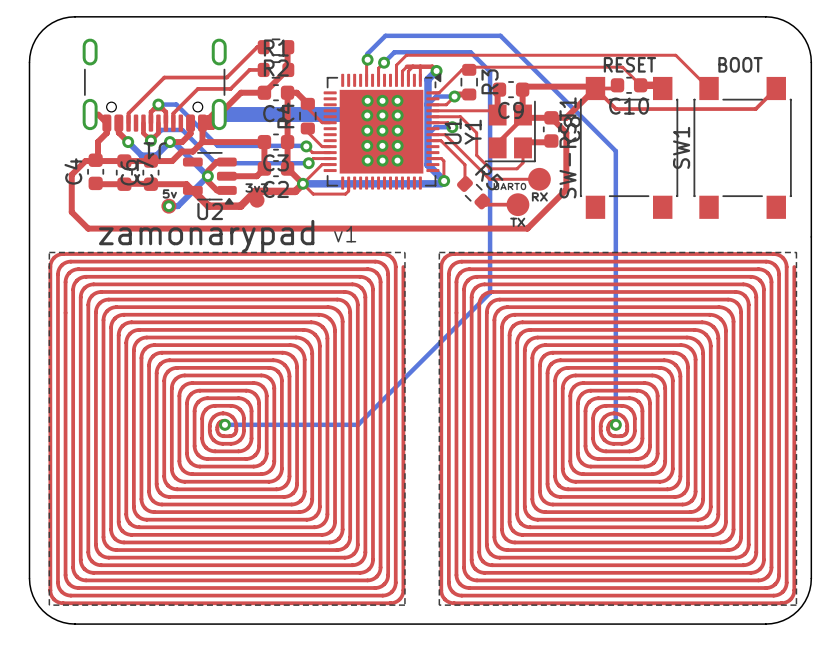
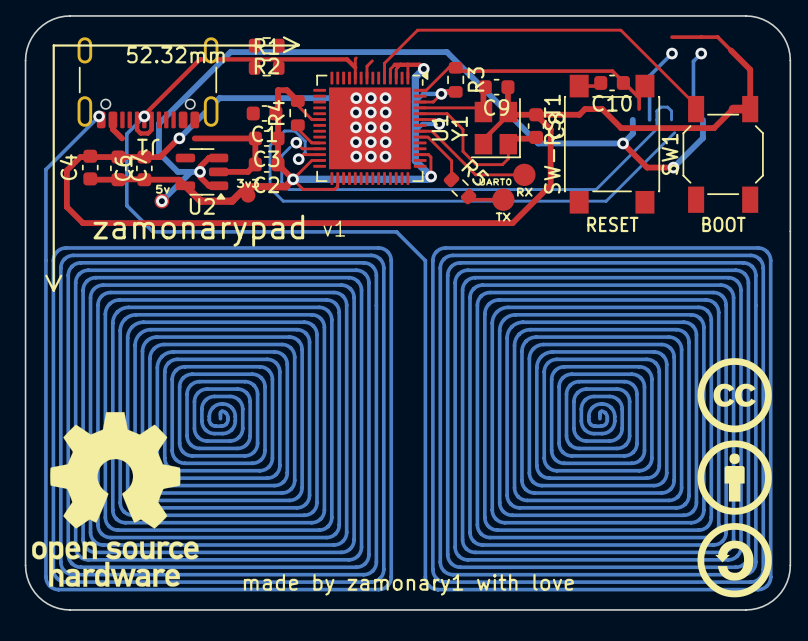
line: none -> (283, 37) (298, 44) (283, 52)
top track: (287, 43) (287, 69) (264, 92) (241, 92) (211, 122) (207, 122) -> none
top track: (263, 47) (257, 47) (226, 77) (164, 77) (128, 113) (128, 123) -> none
line: none -> (298, 45) (53, 45) (53, 290)
top track: (406, 55) (675, 55) (709, 88) -> (394, 53) (417, 30) (620, 30) (696, 105) (696, 109)
bottom track: none -> (672, 53) (649, 75) (649, 119)
via: none -> (672, 53)
bottom track: none -> (701, 53) (693, 61) (693, 119)
via: none -> (701, 53)
text: none -> 52.32mm (175, 54)
bottom track: (367, 59) (367, 53) (385, 35) (500, 35) (615, 151) (615, 424) -> none
via: (367, 59) -> none
bottom track: (383, 62) (394, 52) (470, 52) (490, 71) (490, 292) (358, 424) (224, 424) -> none
via: (384, 62) -> none
text position: RESET (629, 64) -> RESET (612, 224)
text position: BOOT (740, 64) -> BOOT (723, 224)
top track: (264, 69) (249, 69) (230, 88) (197, 88) (173, 113) (173, 123) -> none
top track: (469, 69) (471, 67) (622, 67) (640, 85) (659, 85) (662, 88) -> (456, 68) (458, 71) (612, 71) (639, 97) (639, 109)
SW1 footprint: [693, 76, 792, 219] -> [682, 95, 764, 213]
top track: (525, 86) (593, 86) (595, 88) -> none
top track: (595, 88) (566, 117) -> (672, 37) (717, 37) (750, 69) (750, 109) (733, 109) (714, 128) (621, 128) (602, 109) (585, 109) (579, 114) (550, 114)
top track: (595, 88) (616, 109) (755, 109) (776, 88) -> none
C1 position: (275, 92) -> (264, 113)
bottom track: none -> (356, 98) (219, 98) (179, 138)
bottom track: (158, 104) (176, 104) (217, 145) (306, 146) -> none
via: (158, 104) -> none
top track: (90, 114) (98, 114) (106, 123) (106, 133) (98, 141) (98, 161) -> none
bottom track: (219, 114) (366, 114) -> none
top track: (150, 118) (150, 112) (153, 109) (162, 109) (165, 112) (165, 123) -> (144, 114) (199, 59) (347, 59) (355, 67)
bottom track: none -> (99, 116) (45, 169) (45, 576) (47, 583) (52, 587) (58, 589) (378, 589) (387, 585) (391, 576)
via: none -> (99, 116)
bottom track: none -> (144, 116) (126, 133) (126, 205) (153, 231) (396, 231) (425, 260) (425, 576) (430, 586) (438, 589) (758, 589) (767, 585) (770, 576)
via: none -> (144, 116)
top track: (190, 123) (190, 133) (182, 142) (169, 142) -> none
top track: (202, 123) (202, 142) (192, 151) (181, 151) (172, 161) (166, 161) -> (179, 138) (160, 157)
bottom track: none -> (632, 119) (632, 133) (623, 143) (538, 143) (446, 52) (230, 52) (158, 123) (158, 152) (177, 171) (200, 171)
bottom track: none -> (671, 119) (671, 111) (667, 107) (660, 107) (656, 111) (656, 128) (596, 189) (288, 189) (281, 182) (281, 155) (290, 147)
bottom track: none -> (702, 119) (702, 138) (673, 167)
bottom track: (150, 140) (161, 129) (182, 129) (215, 163) (308, 163) -> (674, 132) (606, 201) (283, 201) (270, 188) (270, 145) (284, 131) (294, 131) (305, 141) (305, 152) (298, 159)
via: (150, 140) -> none
via: none -> (179, 138)
bottom track: (128, 142) (141, 155) (156, 155) (169, 142) (173, 142) (207, 176) (177, 206) (168, 206) -> (191, 171) (161, 201)
via: (128, 142) -> none
via: (169, 142) -> none
top track: none -> (623, 143) (647, 167) (673, 167)
via: none -> (623, 143)
via: none -> (673, 167)
line: (49, 252) (404, 252) (404, 605) (49, 605) (49, 252) -> none
line: (439, 252) (796, 252) (796, 605) (439, 605) (439, 252) -> none
top track: (403, 266) (403, 590) (399, 599) (390, 603) (63, 603) (54, 599) (50, 590) -> none
top track: (794, 267) (794, 590) (790, 599) (781, 603) (454, 603) (445, 599) (441, 590) -> none
line: none -> (46, 275) (53, 290) (61, 275)
drawing: none -> [697, 358, 772, 598]
drawing: none -> [32, 412, 199, 587]
via: (224, 424) -> none
via: (615, 424) -> none
top track: (224, 428) (224, 421) (220, 421) (217, 427) (219, 434) (230, 436) (235, 433) (236, 423) (232, 417) (223, 413) (213, 417) (210, 423) (209, 430) (214, 441) (221, 443) (232, 443) (240, 439) (243, 432) (243, 418) (240, 409) (230, 405) (212, 406) (205, 409) (202, 417) (202, 438) (207, 448) (213, 451) (238, 451) (248, 446) (251, 439) (251, 411) (247, 402) (238, 398) (206, 398) (198, 402) (194, 411) (194, 447) (198, 455) (205, 458) (246, 458) (256, 454) (259, 447) (259, 403) (255, 394) (246, 390) (198, 390) (190, 394) (187, 403) (187, 453) (190, 462) (199, 466) (253, 466) (262, 462) (266, 453) (266, 394) (262, 386) (253, 383) (191, 383) (183, 386) (179, 396) (179, 461) (183, 470) (192, 474) (261, 474) (270, 470) (274, 461) (274, 388) (270, 379) (261, 375) (184, 375) (175, 379) (171, 388) (171, 468) (175, 477) (184, 481) (268, 481) (278, 477) (281, 468) (281, 380) (278, 371) (268, 367) (177, 367) (168, 371) (164, 380) (164, 476) (168, 485) (177, 489) (276, 489) (285, 485) (289, 476) (289, 376) (284, 365) (273, 360) (169, 360) (160, 364) (156, 373) (156, 483) (160, 493) (169, 496) (284, 496) (293, 493) (297, 483) (297, 367) (292, 356) (282, 352) (162, 352) (152, 356) (149, 365) (149, 491) (152, 500) (162, 504) (291, 504) (300, 500) (304, 491) (304, 359) (300, 349) (290, 345) (154, 345) (145, 348) (141, 358) (141, 499) (145, 508) (154, 512) (299, 512) (308, 508) (312, 499) (312, 353) (307, 342) (296, 337) (146, 337) (137, 341) (133, 350) (133, 506) (137, 515) (146, 519) (306, 519) (316, 515) (319, 506) (319, 346) (315, 334) (303, 329) (139, 329) (130, 333) (126, 342) (126, 514) (130, 523) (139, 527) (314, 527) (323, 523) (327, 514) (327, 338) (322, 327) (311, 322) (131, 322) (122, 326) (118, 335) (118, 521) (122, 531) (131, 534) (322, 534) (331, 531) (335, 521) (335, 330) (330, 319) (318, 314) (124, 314) (114, 318) (111, 327) (111, 529) (114, 538) (124, 542) (329, 542) (338, 538) (342, 529) (342, 321) (338, 311) (328, 307) (116, 307) (107, 310) (103, 320) (103, 537) (107, 546) (116, 550) (337, 550) (346, 546) (350, 537) (350, 312) (346, 303) (337, 299) (108, 299) (99, 303) (95, 312) (95, 544) (99, 553) (108, 557) (344, 557) (353, 553) (357, 544) (357, 304) (353, 295) (344, 291) (101, 291) (92, 295) (88, 304) (88, 552) (92, 561) (101, 565) (352, 565) (361, 561) (365, 552) (365, 297) (361, 288) (352, 284) (93, 284) (84, 288) (80, 297) (80, 559) (84, 569) (93, 572) (360, 572) (369, 569) (372, 559) (372, 289) (369, 280) (360, 276) (86, 276) (76, 280) (73, 289) (73, 567) (76, 576) (86, 580) (367, 580) (376, 576) (380, 567) (380, 282) (376, 272) (367, 269) (78, 269) (69, 272) (65, 282) (65, 575) (69, 584) (78, 588) (375, 588) (384, 584) (388, 575) (388, 274) (384, 265) (375, 261) (70, 261) (61, 265) (57, 274) (57, 582) (61, 591) (70, 595) (382, 595) (391, 591) (395, 582) (395, 266) (391, 257) (382, 254) (63, 254) (54, 257) (50, 266) (50, 590) -> none
bottom track: none -> (220, 418) (220, 412) (224, 412) (227, 417) (225, 424) (214, 426) (210, 423) (209, 414) (213, 407) (221, 403) (231, 407) (234, 413) (235, 420) (230, 430) (224, 433) (212, 433) (204, 428) (201, 422) (201, 409) (205, 400) (214, 396) (232, 396) (239, 400) (242, 407) (242, 428) (237, 438) (231, 440) (207, 441) (197, 436) (194, 429) (194, 401) (198, 392) (207, 389) (238, 389) (246, 392) (250, 401) (250, 437) (246, 444) (239, 448) (199, 448) (189, 443) (187, 437) (187, 394) (190, 385) (199, 381) (246, 381) (253, 385) (257, 394) (257, 443) (253, 452) (244, 455) (192, 455) (183, 452) (179, 443) (179, 385) (183, 377) (192, 374) (253, 374) (261, 377) (265, 386) (265, 450) (261, 459) (252, 463) (184, 463) (175, 459) (172, 450) (172, 379) (175, 370) (184, 366) (259, 366) (268, 370) (272, 379) (272, 458) (268, 467) (259, 470) (177, 470) (168, 467) (164, 458) (164, 372) (168, 363) (177, 359) (267, 359) (276, 363) (279, 372) (279, 465) (276, 474) (267, 478) (170, 478) (161, 474) (157, 465) (157, 367) (161, 356) (173, 351) (274, 351) (283, 355) (287, 364) (287, 472) (283, 481) (274, 485) (162, 485) (153, 481) (149, 472) (149, 358) (154, 348) (164, 344) (282, 344) (290, 348) (294, 357) (294, 480) (290, 489) (282, 493) (155, 493) (146, 489) (142, 480) (142, 351) (146, 341) (156, 337) (289, 337) (298, 340) (302, 349) (302, 487) (298, 496) (289, 500) (147, 500) (138, 496) (135, 487) (135, 345) (139, 334) (150, 329) (296, 329) (305, 333) (309, 342) (309, 495) (305, 504) (296, 507) (140, 507) (131, 504) (127, 495) (127, 338) (132, 326) (143, 322) (304, 322) (313, 325) (316, 334) (316, 502) (313, 511) (304, 515) (132, 515) (123, 511) (120, 502) (120, 330) (124, 319) (136, 314) (311, 314) (320, 318) (324, 327) (324, 510) (320, 518) (311, 522) (125, 522) (116, 518) (112, 510) (112, 323) (117, 312) (128, 307) (319, 307) (328, 311) (331, 320) (331, 517) (328, 526) (319, 530) (118, 530) (109, 526) (105, 517) (105, 314) (109, 304) (119, 299) (326, 299) (335, 303) (339, 312) (339, 524) (335, 533) (326, 537) (110, 537) (101, 533) (97, 524) (97, 305) (101, 296) (110, 292) (334, 292) (342, 296) (346, 305) (346, 532) (342, 541) (334, 544) (103, 544) (94, 541) (90, 532) (90, 297) (94, 288) (103, 285) (341, 285) (350, 288) (354, 297) (354, 539) (350, 548) (341, 552) (95, 552) (86, 548) (83, 539) (83, 290) (86, 281) (95, 277) (348, 277) (357, 281) (361, 290) (361, 547) (357, 556) (348, 559) (88, 559) (79, 556) (75, 547) (75, 282) (79, 273) (88, 270) (356, 270) (365, 273) (368, 282) (368, 554) (365, 563) (356, 567) (80, 567) (71, 563) (68, 554) (68, 275) (71, 266) (80, 262) (363, 262) (372, 266) (376, 275) (376, 562) (372, 570) (363, 574) (73, 574) (64, 570) (60, 562) (60, 268) (64, 259) (73, 255) (371, 255) (380, 259) (383, 268) (383, 569) (380, 578) (371, 582) (66, 582) (57, 578) (53, 569) (53, 260) (57, 251) (66, 247) (378, 247) (387, 251) (391, 260) (391, 576)
top track: (615, 428) (615, 421) (611, 421) (608, 427) (610, 434) (621, 436) (626, 433) (627, 423) (623, 417) (614, 413) (604, 417) (601, 423) (600, 430) (605, 441) (611, 443) (623, 443) (631, 439) (634, 432) (634, 418) (631, 409) (621, 405) (603, 406) (596, 409) (593, 417) (593, 438) (598, 448) (604, 451) (629, 451) (639, 446) (642, 439) (642, 411) (638, 402) (629, 398) (597, 398) (589, 402) (585, 411) (585, 447) (589, 455) (596, 458) (637, 458) (647, 454) (649, 447) (650, 403) (646, 394) (637, 390) (589, 390) (581, 394) (577, 403) (577, 453) (581, 462) (590, 466) (644, 466) (653, 462) (657, 453) (657, 394) (653, 386) (644, 383) (582, 383) (574, 386) (570, 396) (570, 461) (574, 470) (583, 474) (652, 474) (661, 470) (665, 461) (665, 388) (661, 379) (652, 375) (575, 375) (566, 379) (562, 388) (562, 468) (566, 477) (575, 481) (659, 481) (669, 477) (672, 468) (672, 380) (669, 371) (659, 367) (568, 367) (558, 371) (555, 380) (555, 476) (558, 485) (568, 489) (667, 489) (676, 485) (680, 476) (680, 376) (675, 365) (664, 360) (560, 360) (551, 364) (547, 373) (547, 483) (551, 493) (560, 496) (675, 496) (684, 493) (687, 483) (687, 367) (683, 356) (673, 352) (552, 352) (543, 356) (539, 365) (539, 491) (543, 500) (552, 504) (682, 504) (691, 500) (695, 491) (695, 359) (691, 349) (680, 345) (545, 345) (536, 348) (532, 358) (532, 499) (536, 508) (545, 512) (690, 512) (699, 508) (703, 499) (703, 353) (698, 342) (686, 337) (537, 337) (528, 341) (524, 350) (524, 506) (528, 515) (537, 519) (697, 519) (706, 515) (710, 506) (710, 346) (706, 334) (694, 329) (530, 329) (520, 333) (517, 342) (517, 514) (520, 523) (530, 527) (705, 527) (714, 523) (718, 514) (718, 338) (713, 327) (702, 322) (522, 322) (513, 326) (509, 335) (509, 521) (513, 531) (522, 534) (712, 534) (722, 531) (725, 521) (725, 330) (721, 319) (709, 314) (514, 314) (505, 318) (502, 327) (502, 529) (505, 538) (514, 542) (720, 542) (729, 538) (733, 529) (733, 321) (729, 311) (718, 307) (507, 307) (498, 310) (494, 320) (494, 537) (498, 546) (507, 550) (728, 550) (737, 546) (741, 537) (741, 312) (737, 303) (728, 299) (499, 299) (490, 303) (486, 312) (486, 544) (490, 553) (499, 557) (735, 557) (744, 553) (748, 544) (748, 304) (744, 295) (735, 291) (492, 291) (483, 295) (479, 304) (479, 552) (483, 561) (492, 565) (743, 565) (752, 561) (756, 552) (756, 297) (752, 288) (743, 284) (484, 284) (475, 288) (471, 297) (471, 559) (475, 569) (484, 572) (750, 572) (760, 569) (763, 559) (763, 289) (760, 280) (750, 276) (477, 276) (467, 280) (464, 289) (464, 567) (467, 576) (477, 580) (758, 580) (767, 576) (771, 567) (771, 282) (767, 273) (758, 269) (469, 269) (460, 273) (456, 282) (456, 575) (460, 584) (469, 588) (766, 588) (775, 584) (779, 575) (779, 274) (775, 265) (766, 261) (461, 261) (452, 265) (448, 274) (448, 582) (452, 591) (461, 595) (773, 595) (782, 591) (786, 582) (786, 266) (782, 257) (773, 254) (454, 254) (445, 257) (441, 266) (441, 590) -> none
bottom track: none -> (599, 418) (600, 412) (604, 412) (607, 417) (604, 424) (594, 426) (589, 423) (589, 414) (592, 407) (601, 403) (611, 407) (614, 413) (614, 420) (609, 431) (603, 433) (592, 433) (584, 428) (581, 422) (581, 409) (585, 400) (594, 396) (612, 396) (618, 400) (622, 407) (622, 428) (617, 438) (611, 440) (586, 441) (576, 436) (574, 429) (573, 401) (577, 392) (586, 389) (618, 389) (625, 392) (629, 401) (629, 437) (625, 444) (618, 448) (579, 448) (569, 443) (566, 437) (566, 394) (570, 385) (579, 381) (625, 381) (633, 385) (637, 394) (637, 443) (633, 452) (624, 455) (571, 455) (562, 452) (559, 443) (559, 385) (562, 377) (571, 374) (633, 374) (640, 377) (644, 386) (644, 450) (640, 459) (631, 463) (564, 463) (555, 459) (551, 450) (551, 379) (555, 370) (564, 366) (639, 366) (648, 370) (651, 379) (651, 458) (648, 467) (639, 470) (556, 470) (547, 467) (544, 458) (544, 372) (547, 363) (556, 359) (646, 359) (655, 363) (659, 372) (659, 465) (655, 474) (646, 478) (549, 478) (540, 474) (536, 465) (536, 367) (541, 356) (552, 351) (654, 351) (663, 355) (666, 364) (666, 472) (663, 481) (654, 485) (542, 485) (533, 481) (529, 472) (529, 358) (533, 348) (543, 344) (661, 344) (670, 348) (674, 357) (674, 480) (670, 489) (661, 493) (534, 493) (525, 489) (521, 480) (521, 351) (526, 341) (536, 337) (668, 337) (677, 340) (681, 349) (681, 487) (677, 496) (668, 500) (527, 500) (518, 496) (514, 487) (514, 345) (519, 334) (530, 329) (676, 329) (685, 333) (689, 342) (689, 495) (685, 504) (676, 507) (519, 507) (510, 504) (507, 495) (507, 338) (511, 326) (522, 322) (683, 322) (692, 325) (696, 334) (696, 502) (692, 511) (683, 515) (512, 515) (503, 511) (499, 502) (499, 330) (504, 319) (515, 314) (691, 314) (700, 318) (703, 327) (703, 510) (700, 519) (691, 522) (504, 522) (495, 519) (492, 510) (492, 323) (496, 312) (508, 307) (698, 307) (707, 311) (711, 320) (711, 517) (707, 526) (698, 530) (497, 530) (488, 526) (484, 517) (484, 314) (489, 304) (499, 299) (706, 299) (715, 303) (718, 312) (718, 524) (715, 533) (706, 537) (490, 537) (481, 533) (477, 524) (477, 305) (481, 296) (490, 292) (713, 292) (722, 296) (726, 305) (726, 532) (722, 541) (713, 544) (482, 544) (473, 541) (469, 532) (469, 297) (473, 288) (482, 285) (720, 285) (729, 288) (733, 297) (733, 539) (729, 548) (720, 552) (475, 552) (466, 548) (462, 539) (462, 290) (466, 281) (475, 277) (728, 277) (737, 281) (741, 290) (741, 547) (737, 556) (728, 559) (467, 559) (458, 556) (455, 547) (455, 282) (458, 273) (467, 270) (735, 270) (744, 273) (748, 282) (748, 554) (744, 563) (735, 567) (460, 567) (451, 563) (447, 554) (447, 275) (451, 266) (460, 262) (743, 262) (752, 266) (755, 275) (755, 562) (752, 570) (743, 574) (452, 574) (444, 570) (440, 562) (440, 268) (444, 259) (452, 255) (750, 255) (759, 259) (763, 268) (763, 569) (759, 578) (750, 582) (445, 582) (436, 578) (432, 569) (432, 260) (436, 251) (445, 247) (758, 247) (766, 251) (770, 260) (770, 576)
text: none -> made by zamonary1 with love (408, 584)

